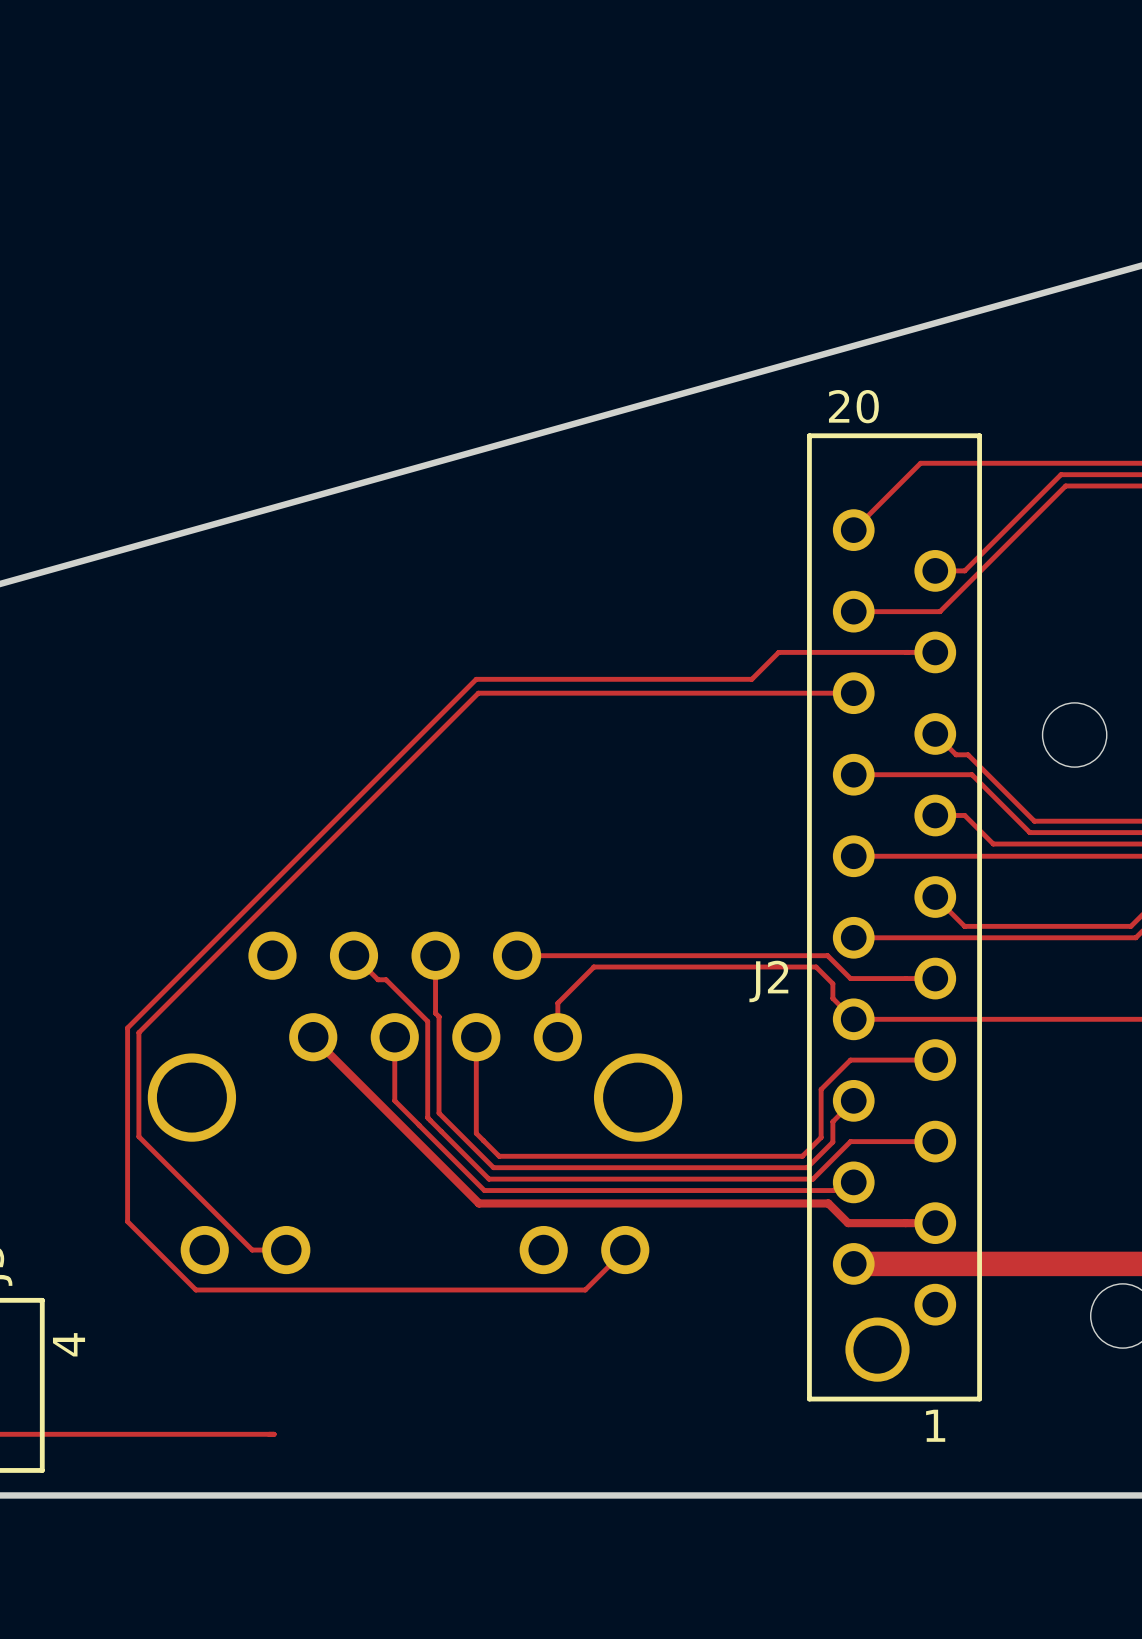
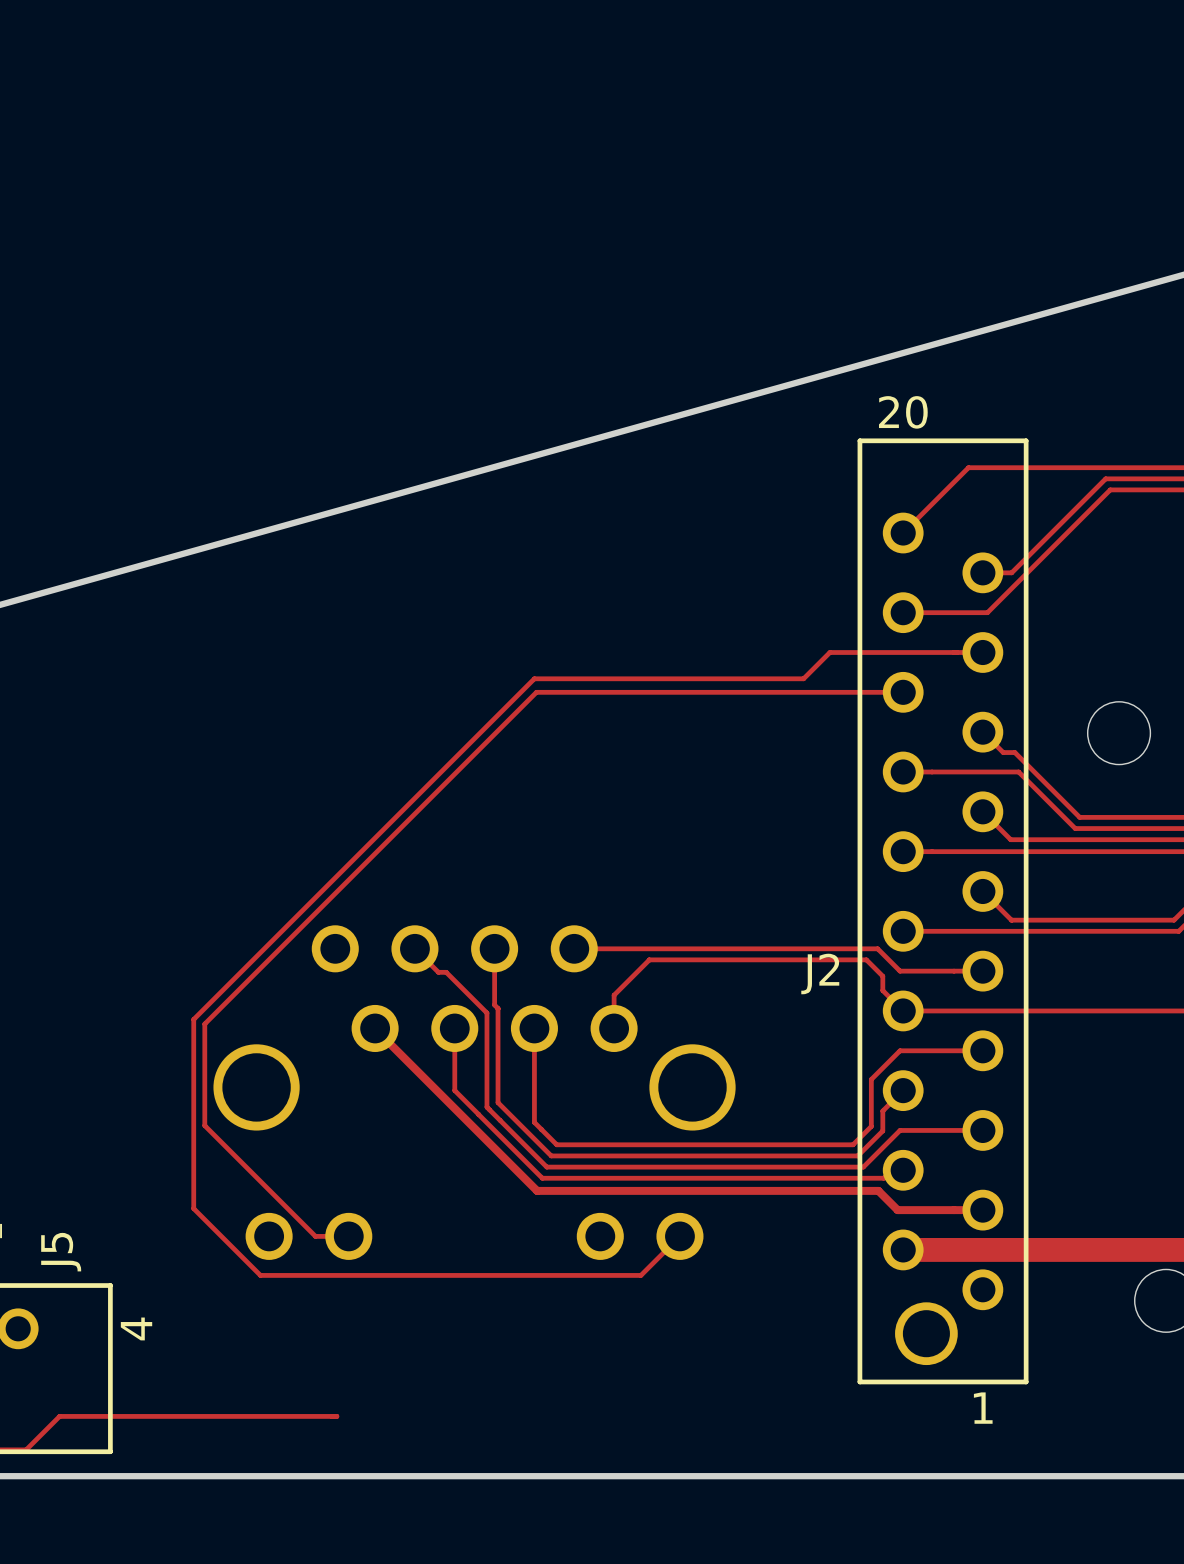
track: (935, 815) (964, 815) (993, 844) -> (982, 811) (1010, 839) (1039, 839)

